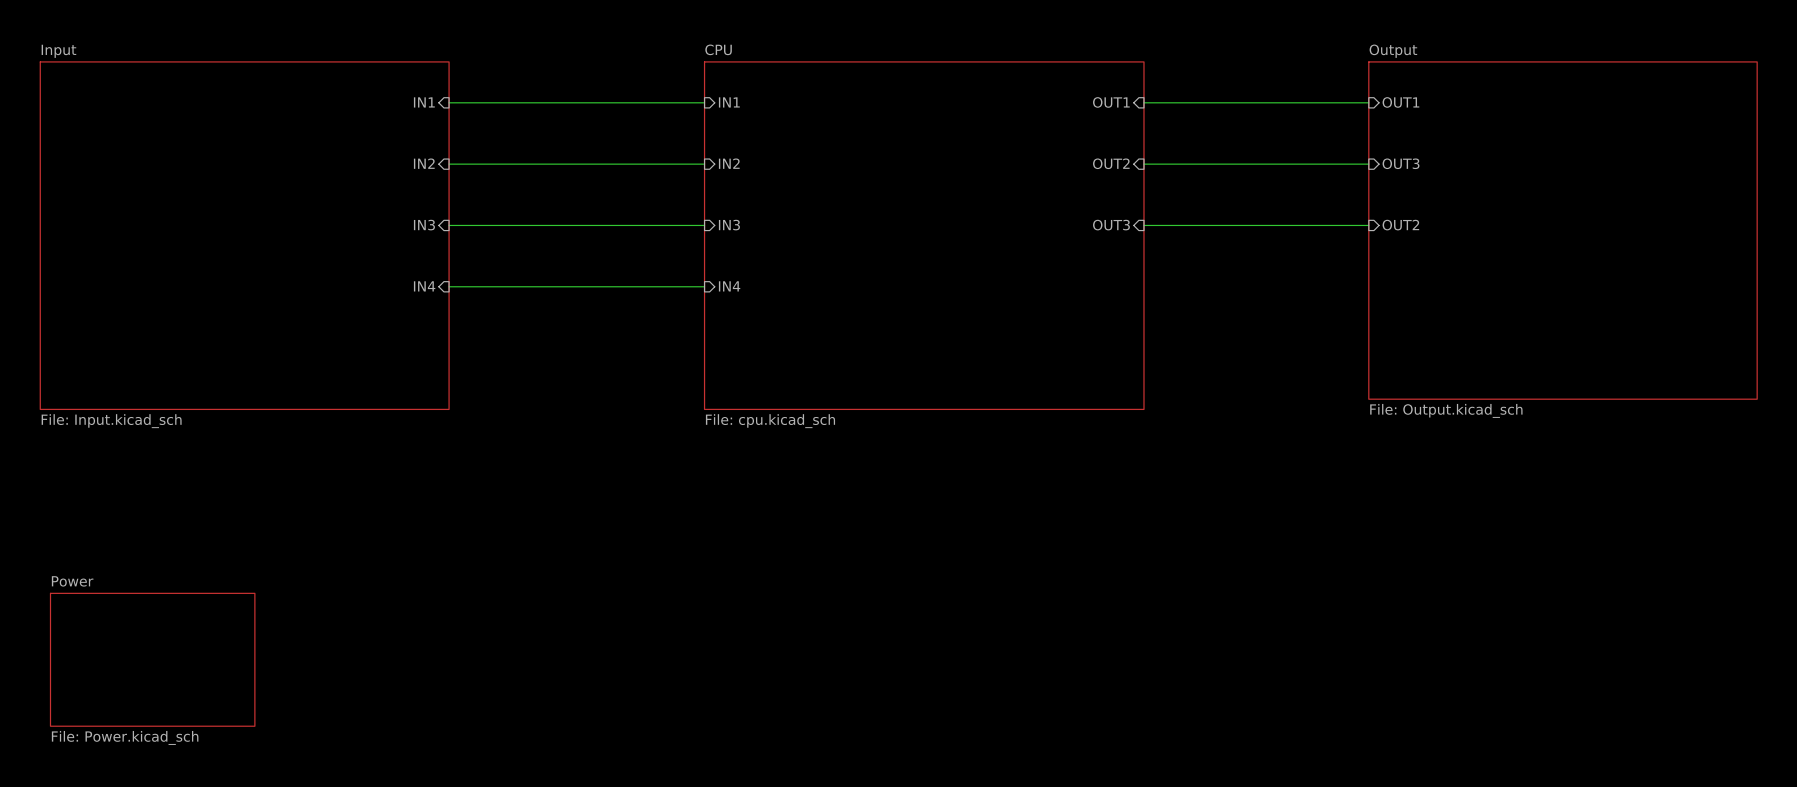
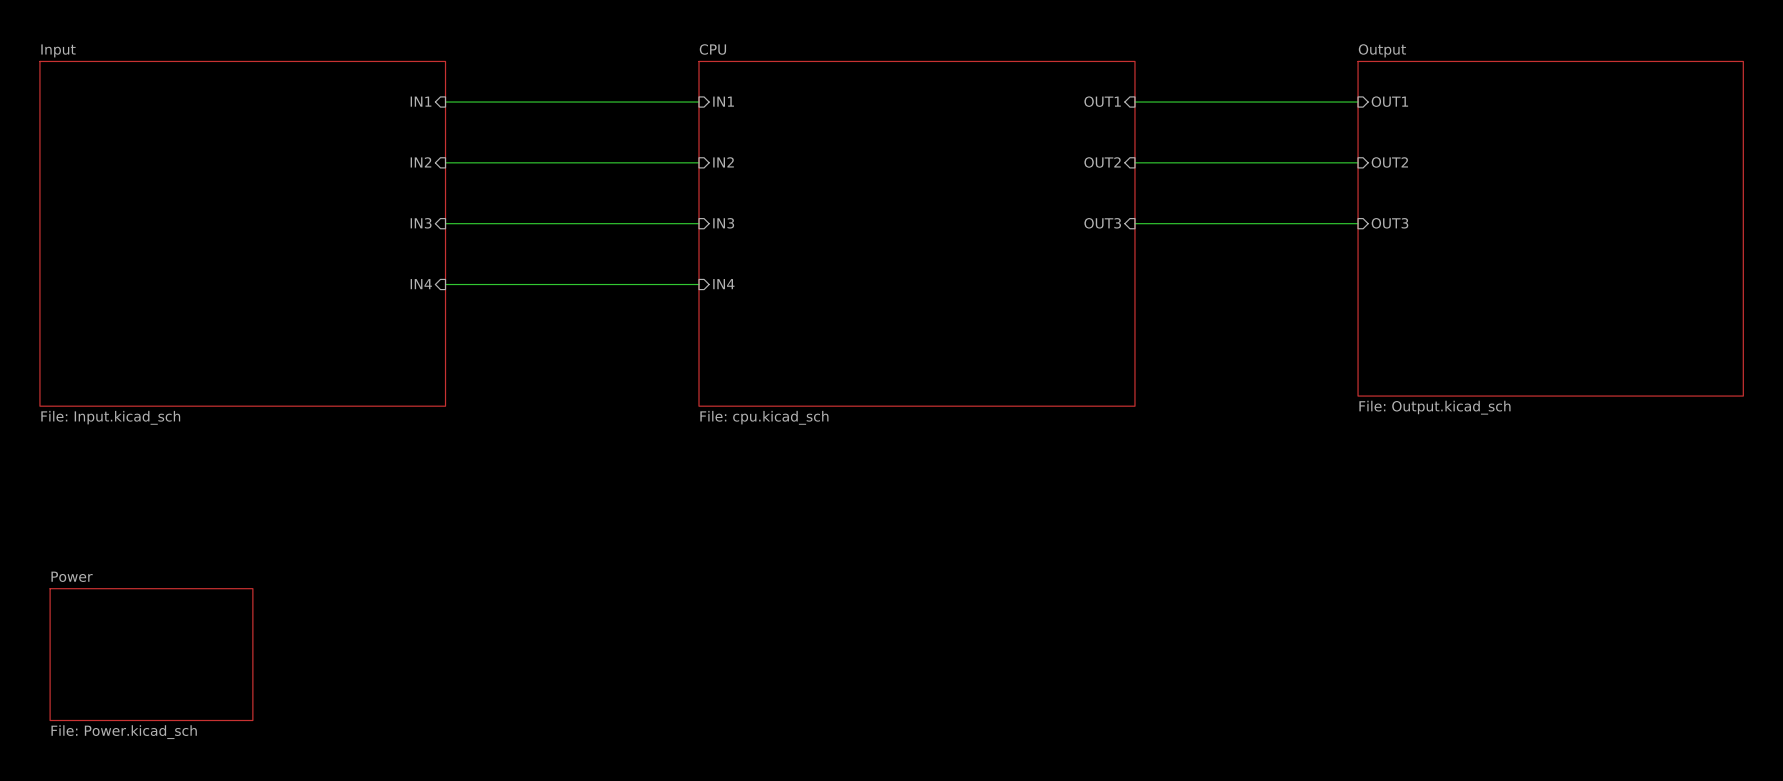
sheet pin: OUT3 (1401, 163) -> OUT2 (1389, 162)
sheet pin: OUT2 (1400, 225) -> OUT3 (1389, 223)

